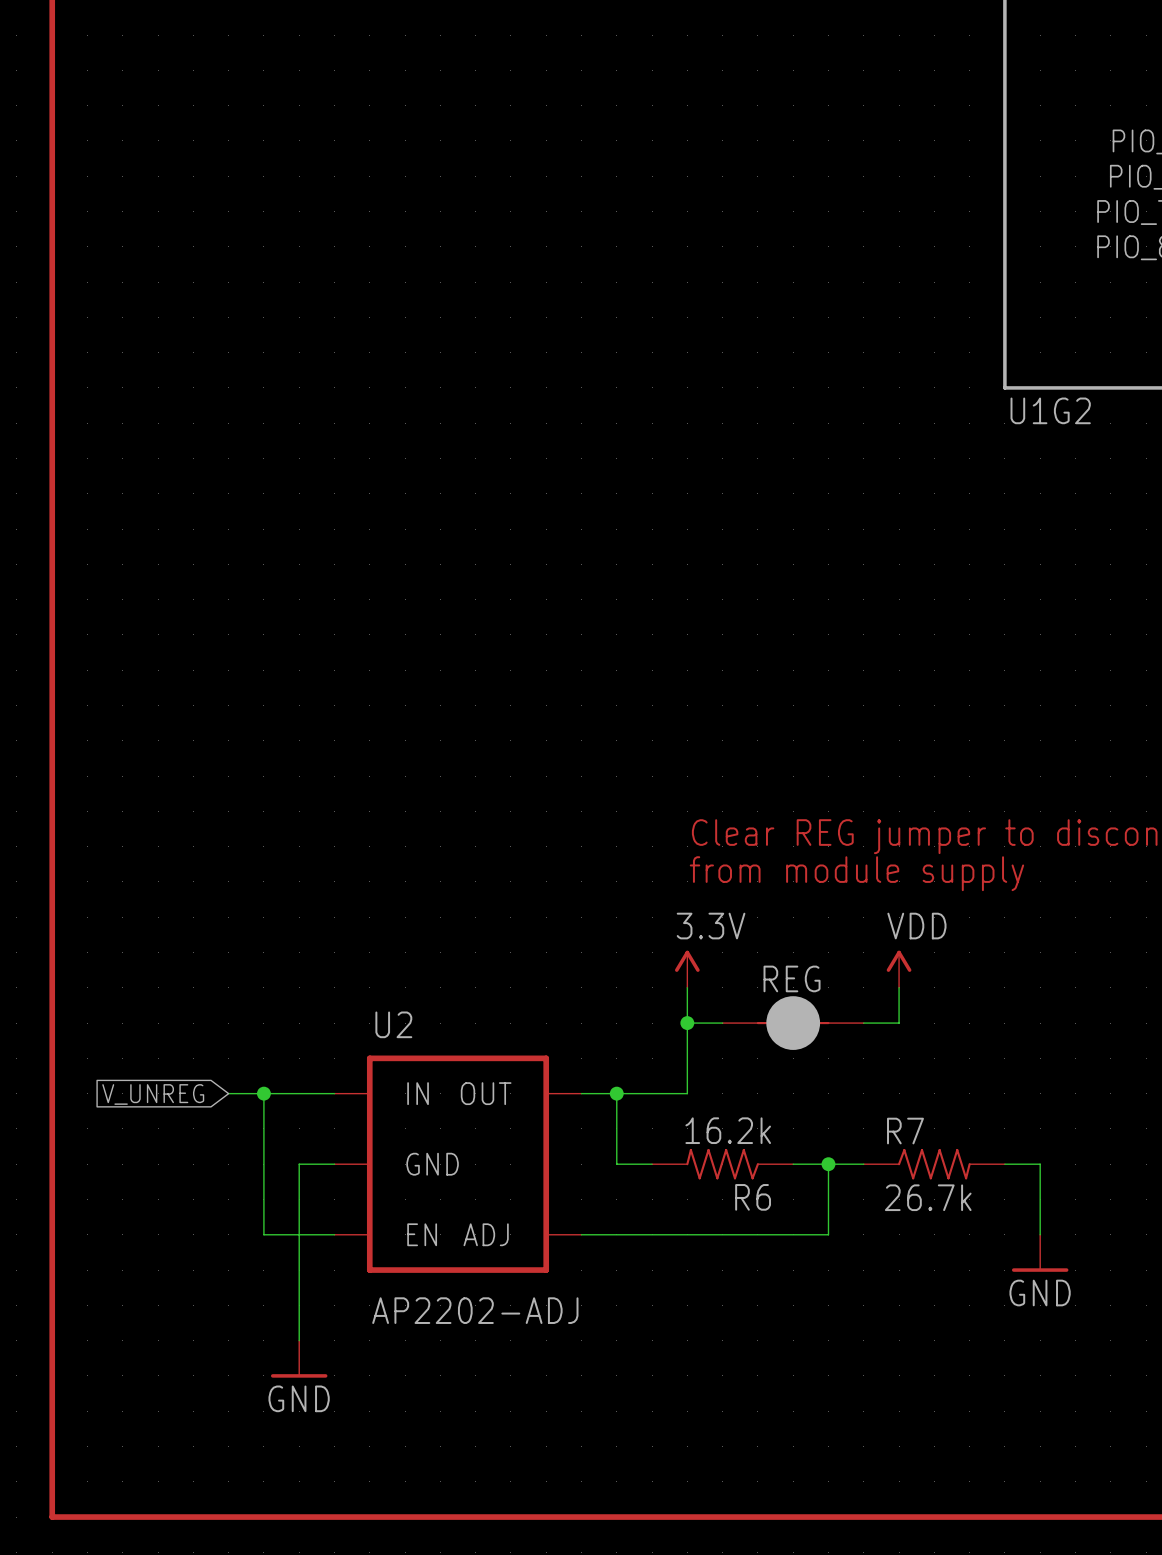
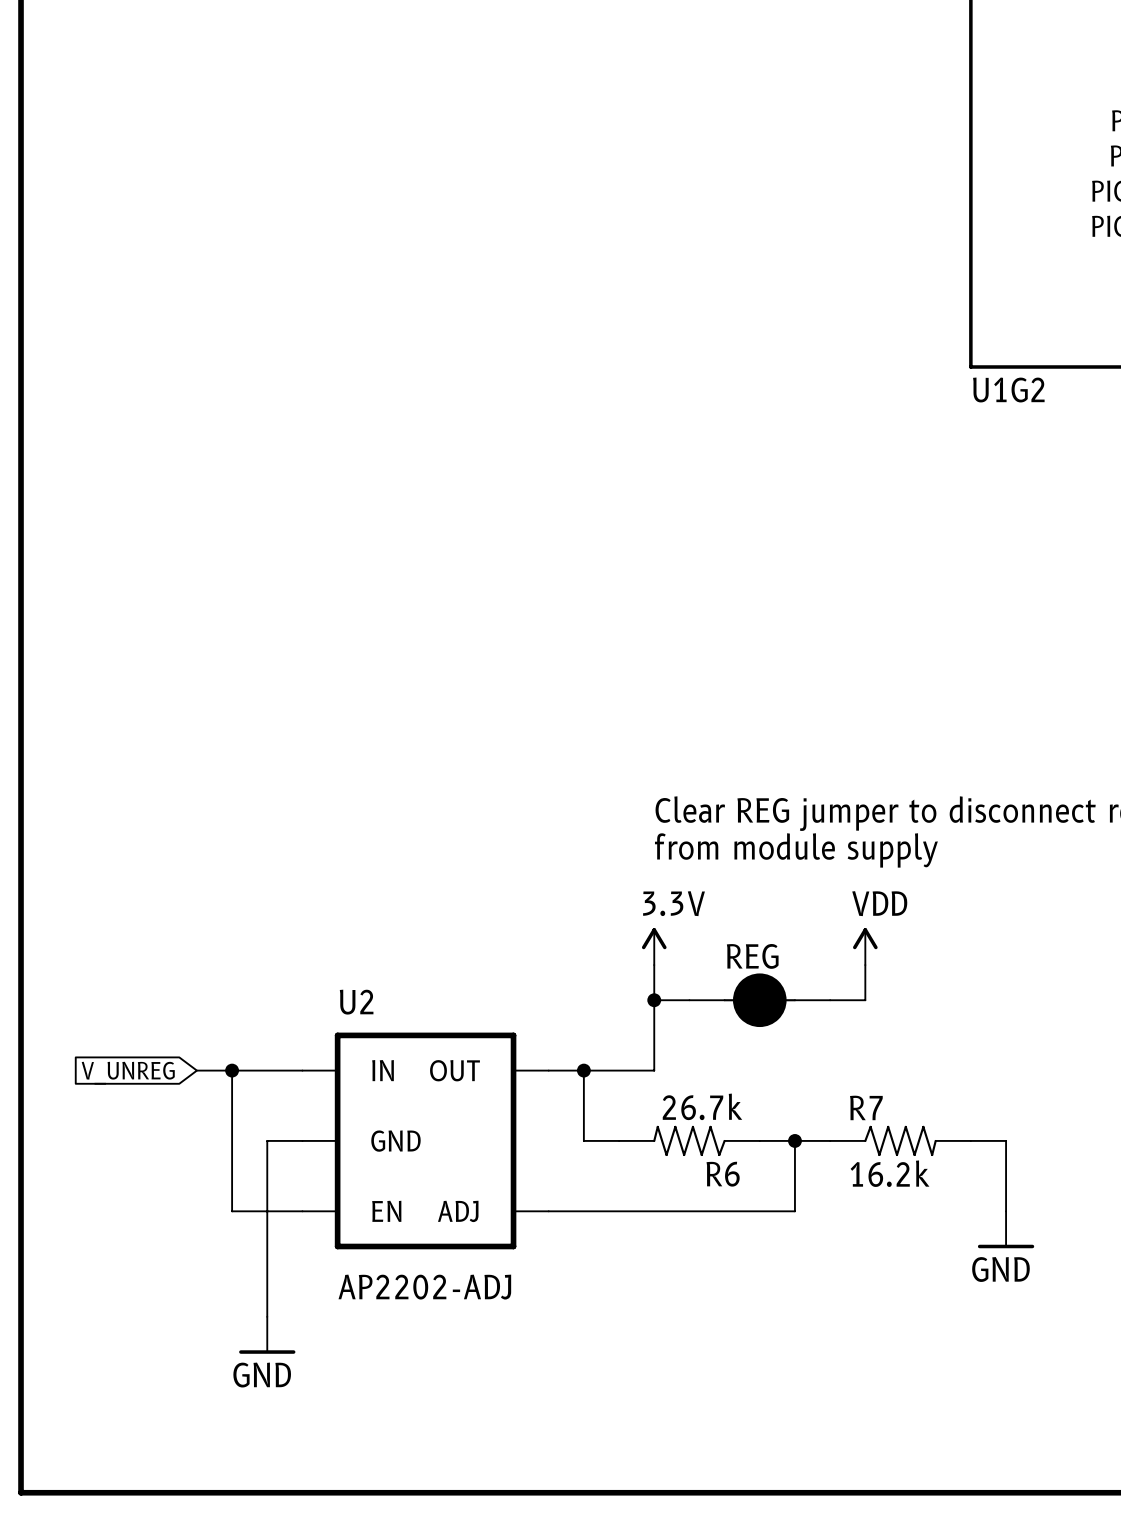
R6 value: 16.2k (728, 1130) -> 26.7k (702, 1106)
R7 value: 26.7k (928, 1197) -> 16.2k (890, 1173)

